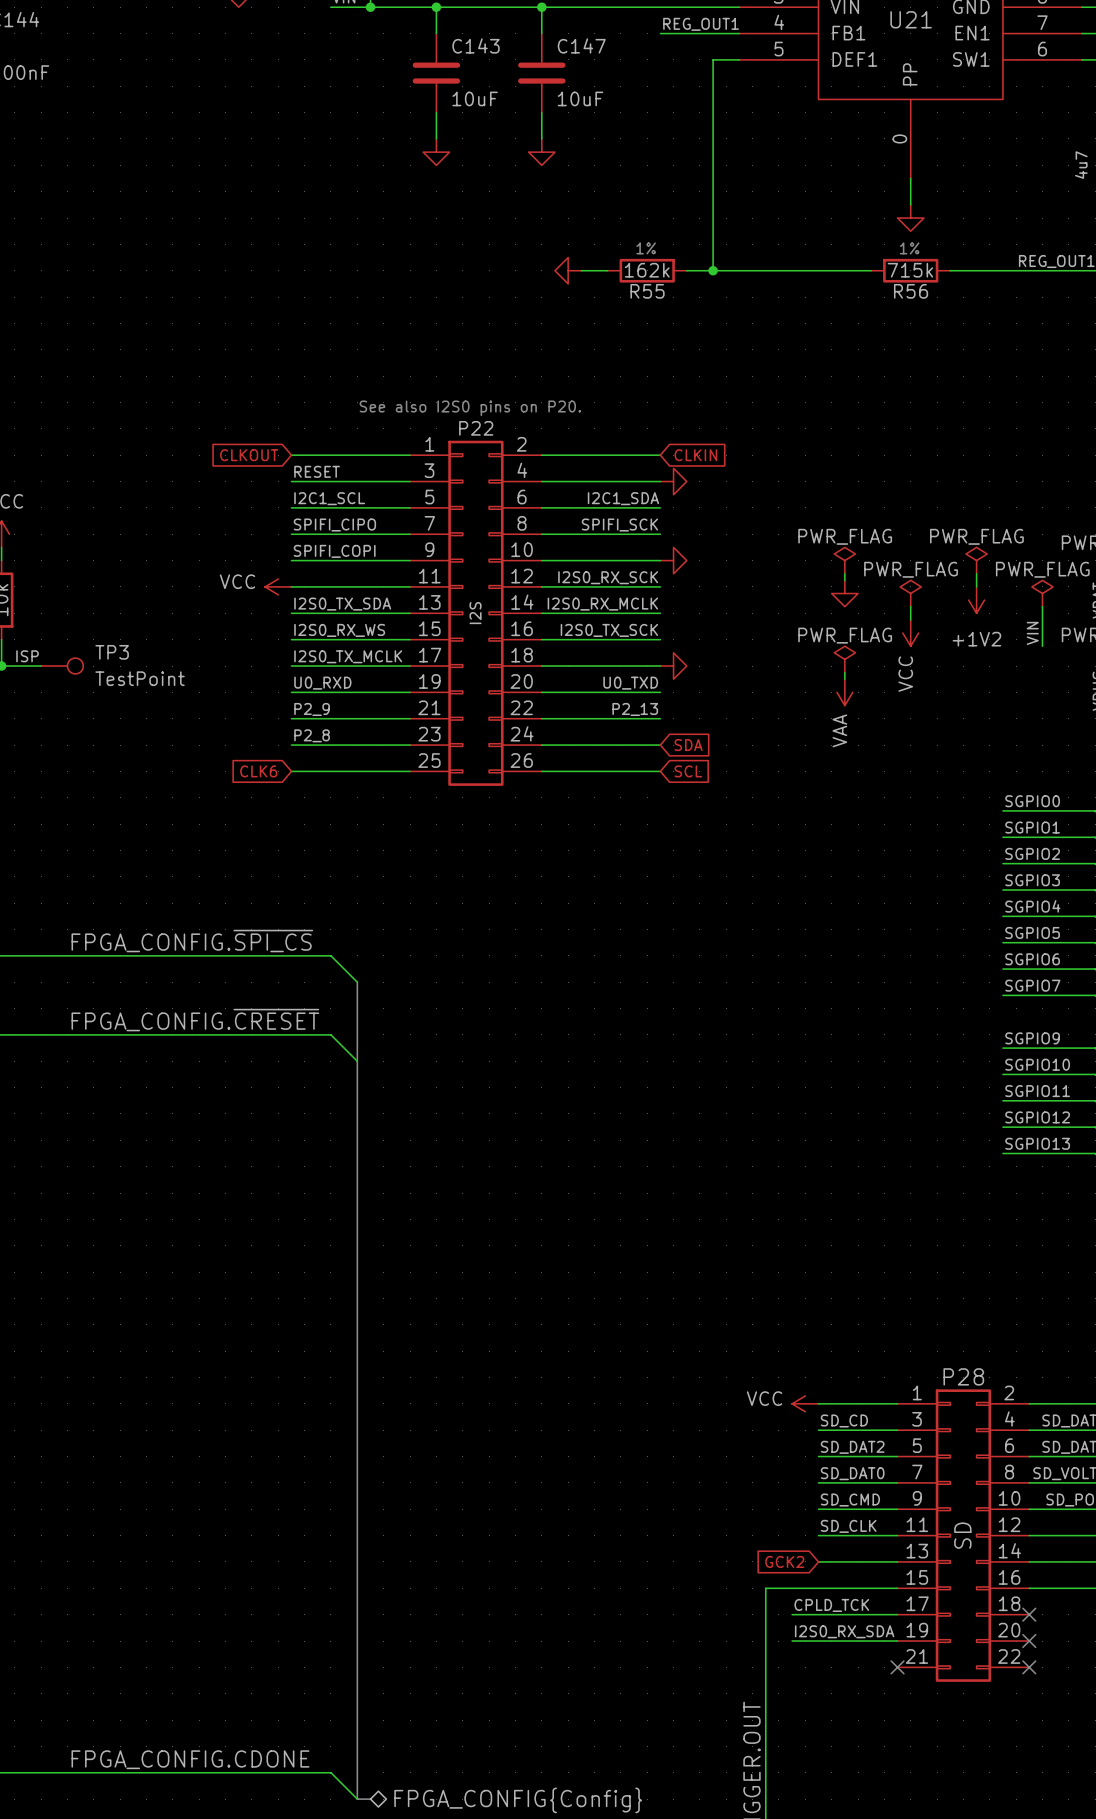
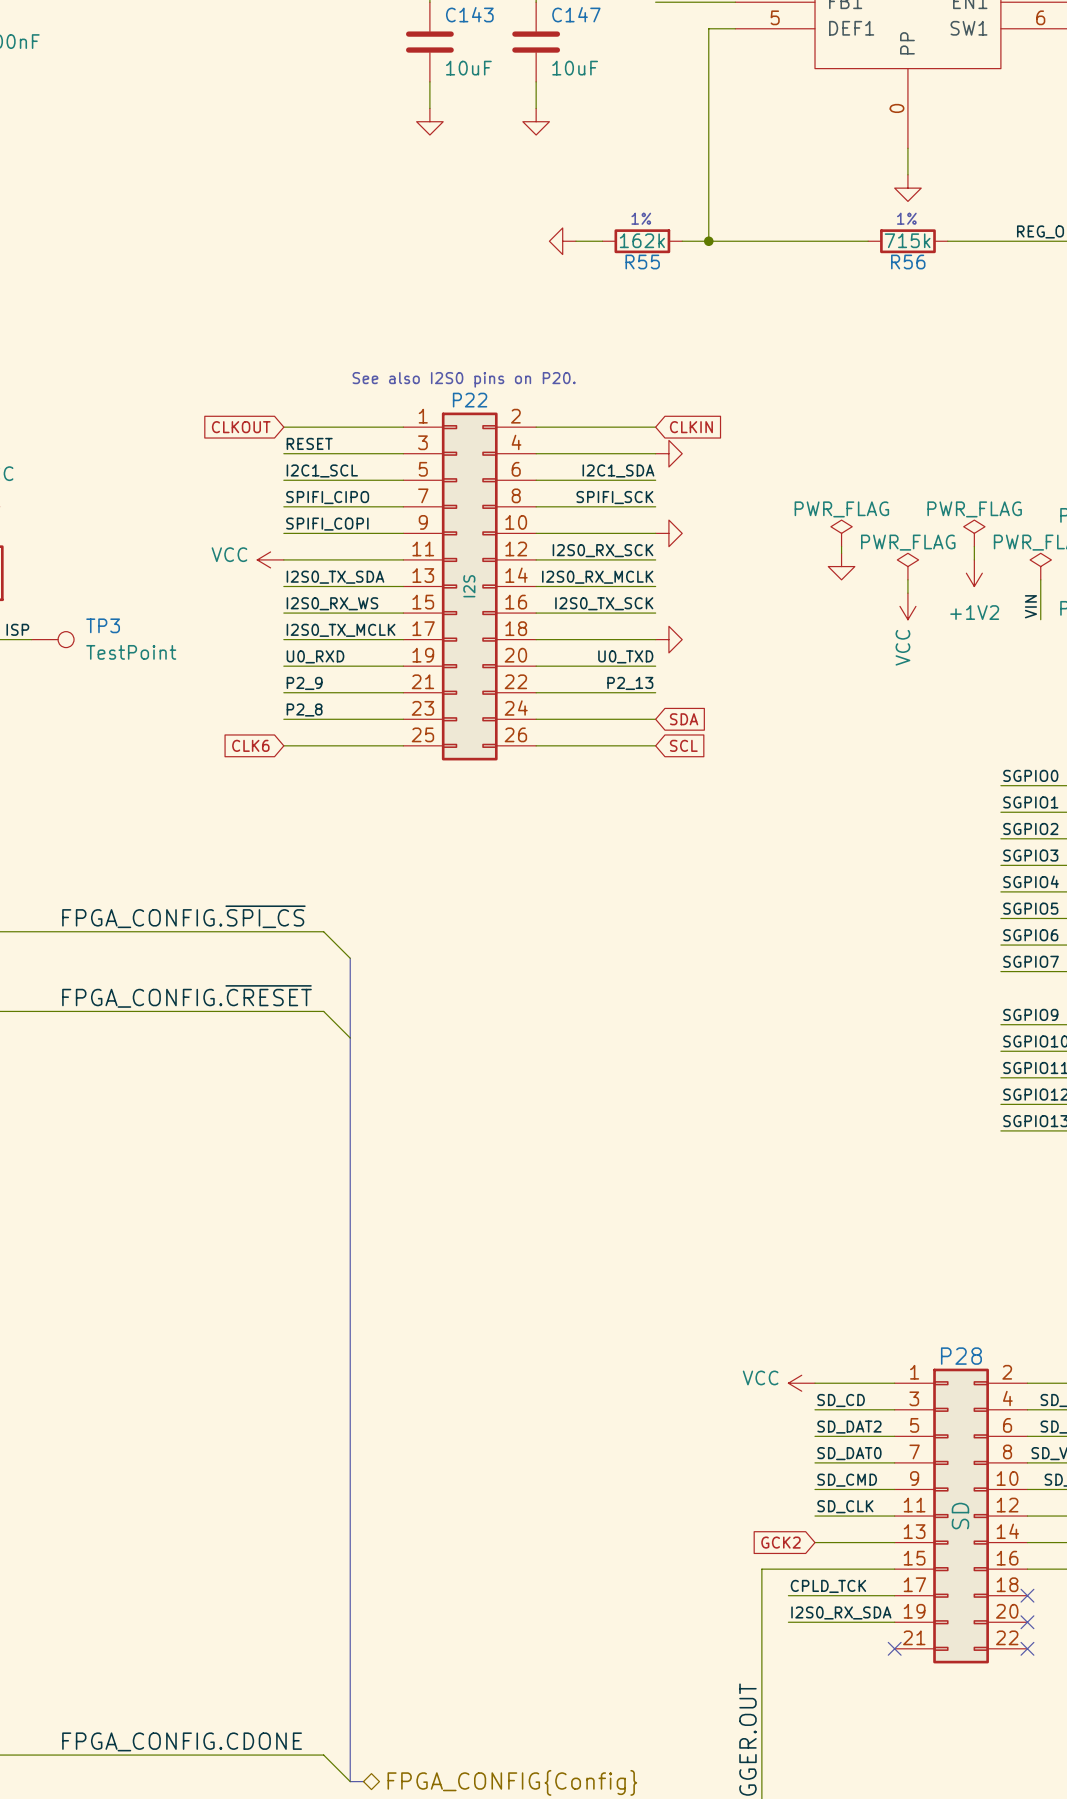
power symbol: PWR_FLAG (844, 659) -> none
wire: (844, 672) (844, 679) -> none
power symbol: VAA (844, 692) -> none

